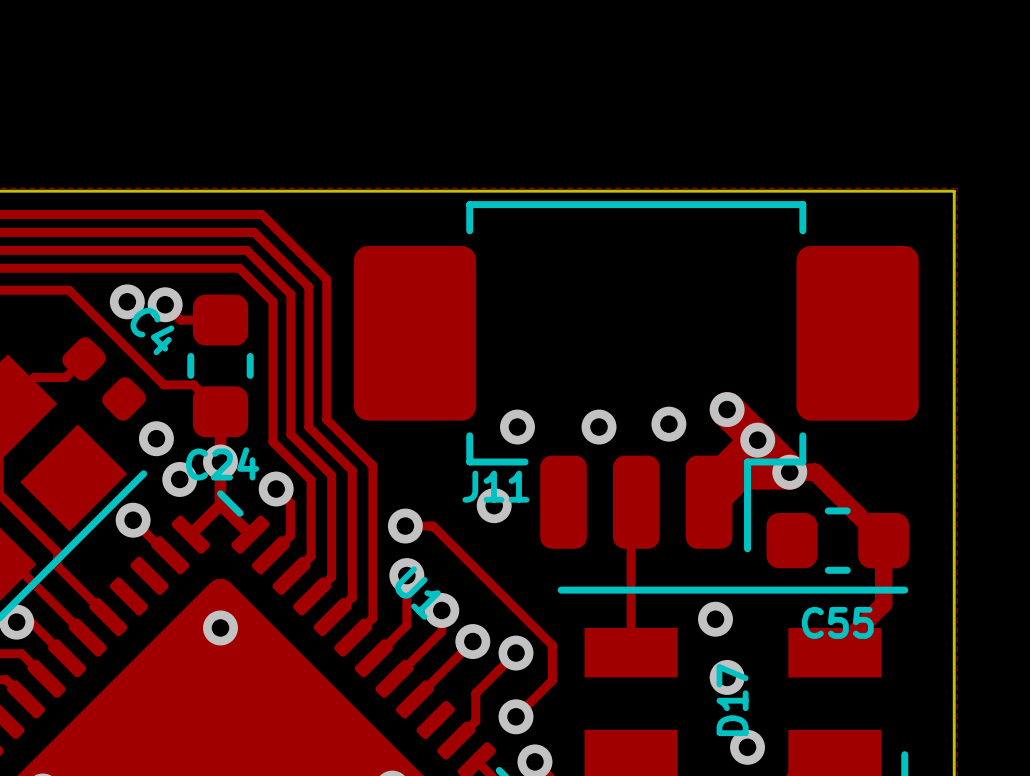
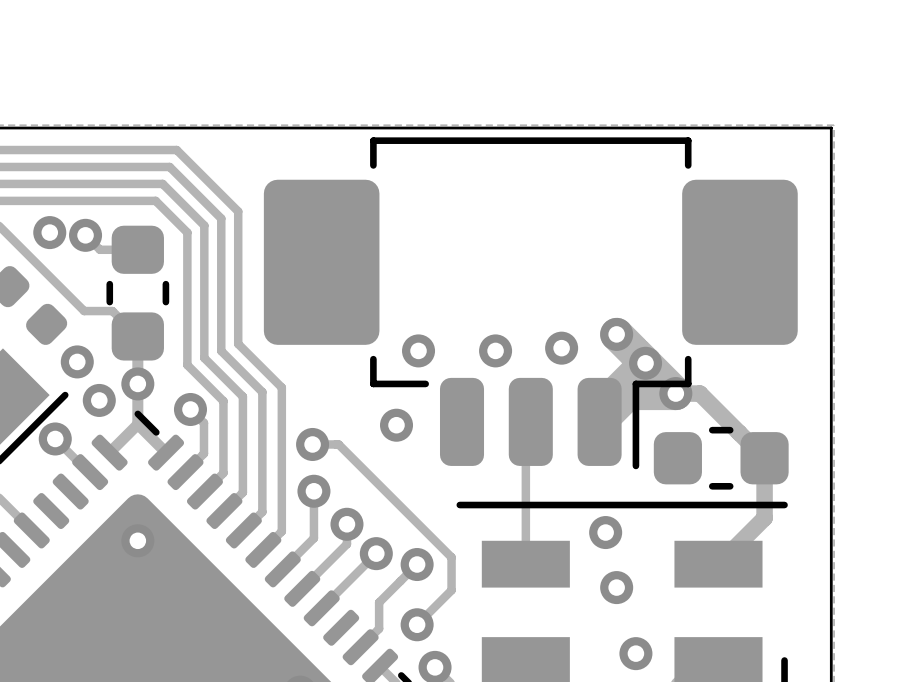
C4 name: C4 (152, 331) -> none
C24 name: C24 (222, 463) -> none
J11 name: J11 (495, 486) -> none
U1 name: U1 (417, 593) -> none
C55 name: C55 (837, 622) -> none
D17 name: D17 (732, 700) -> none

